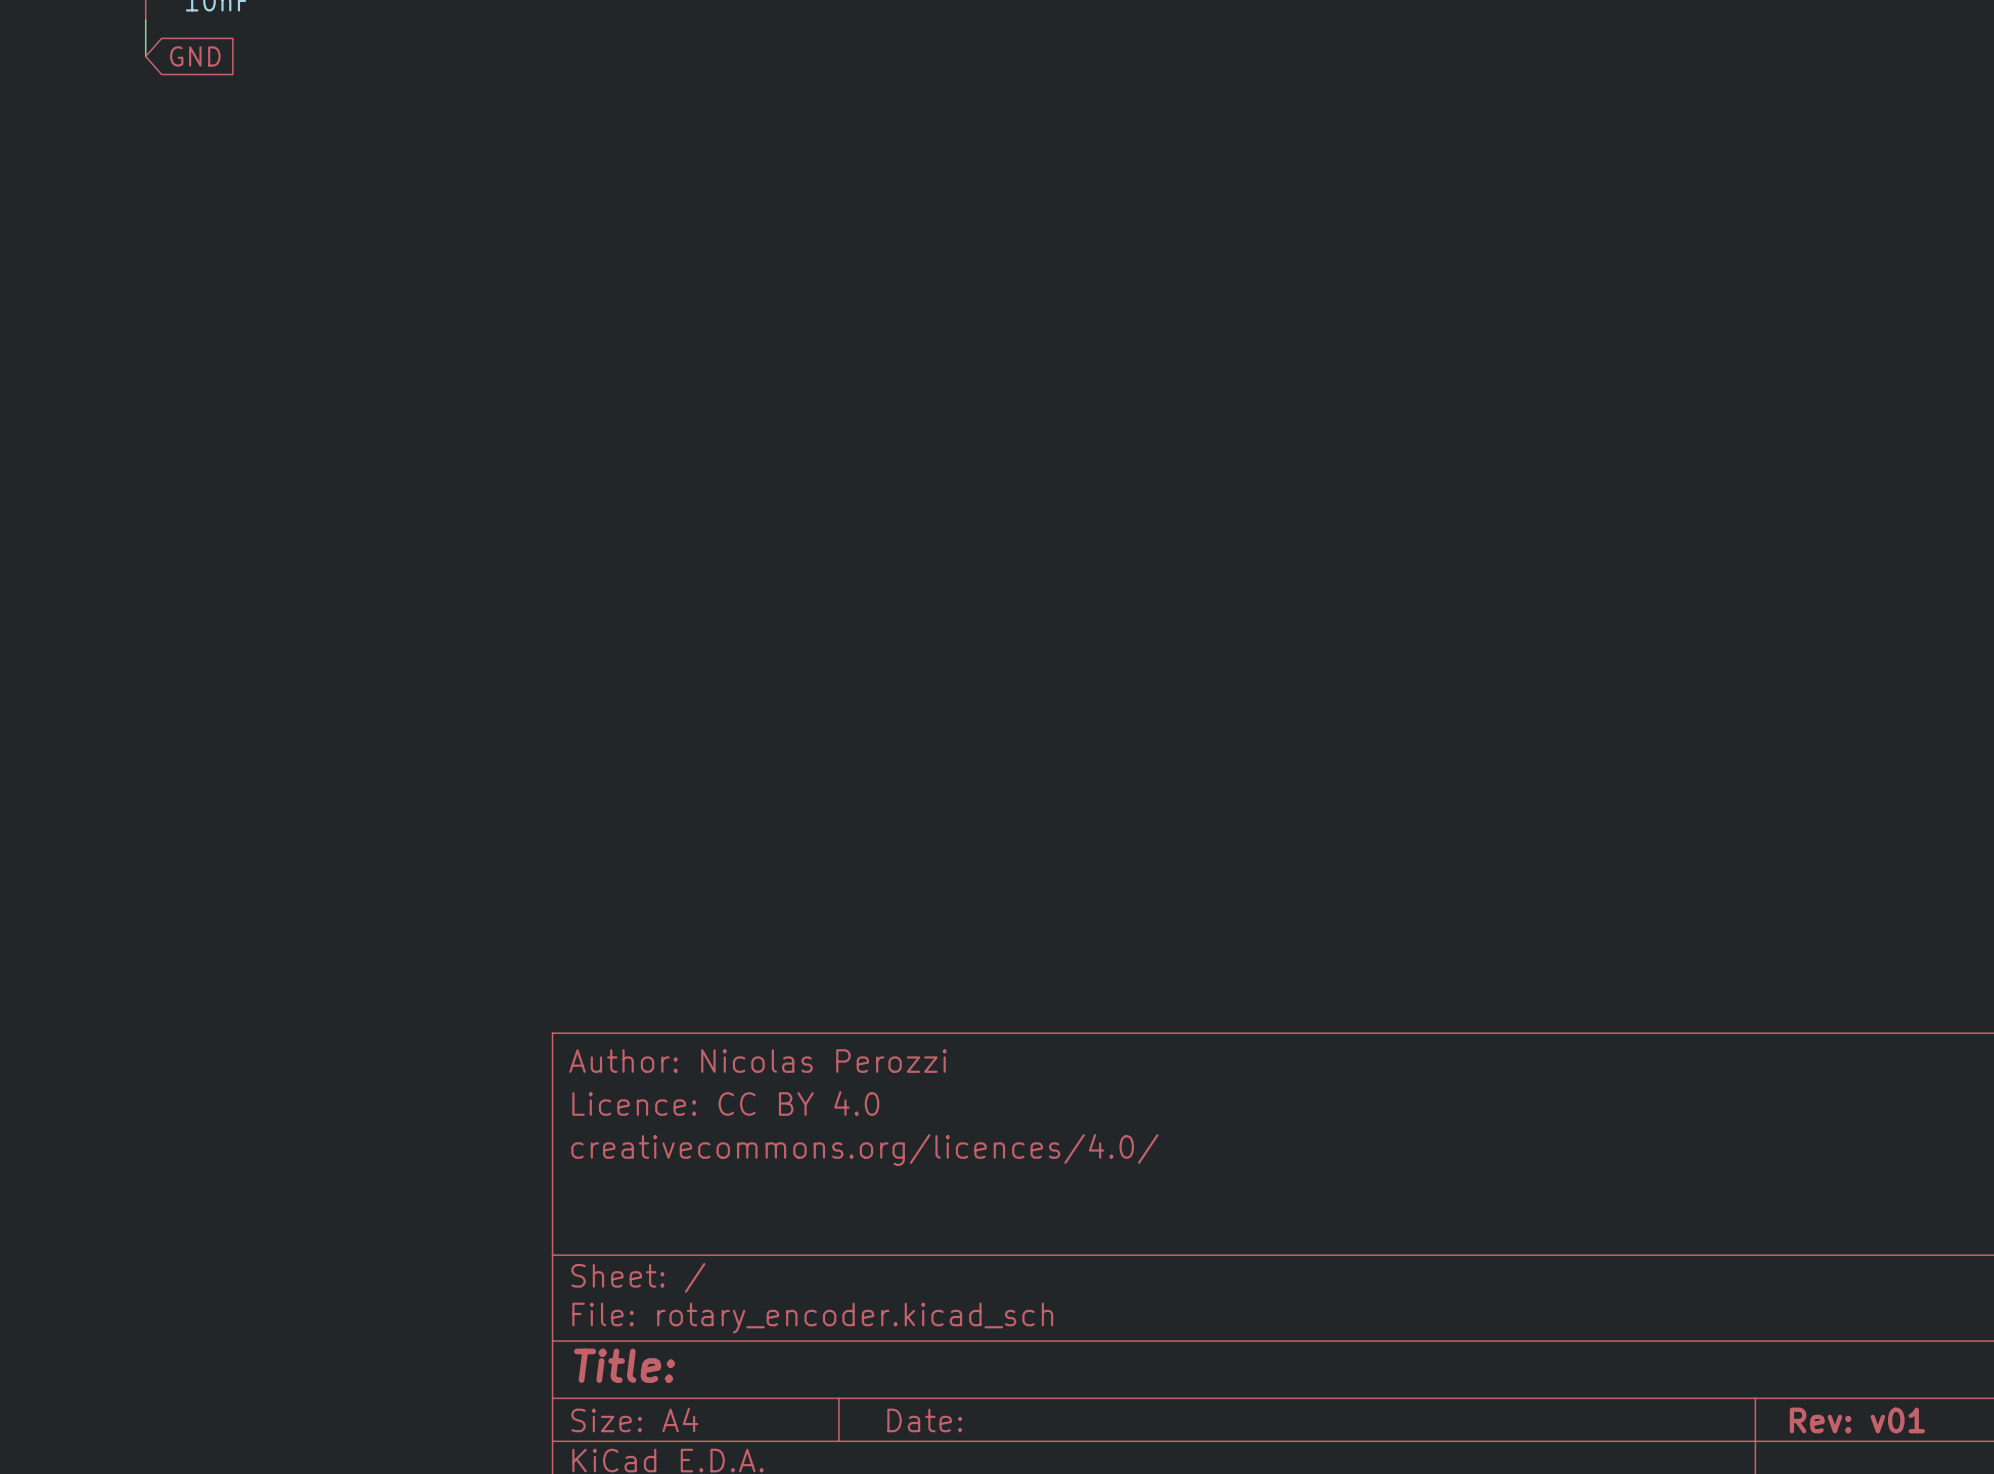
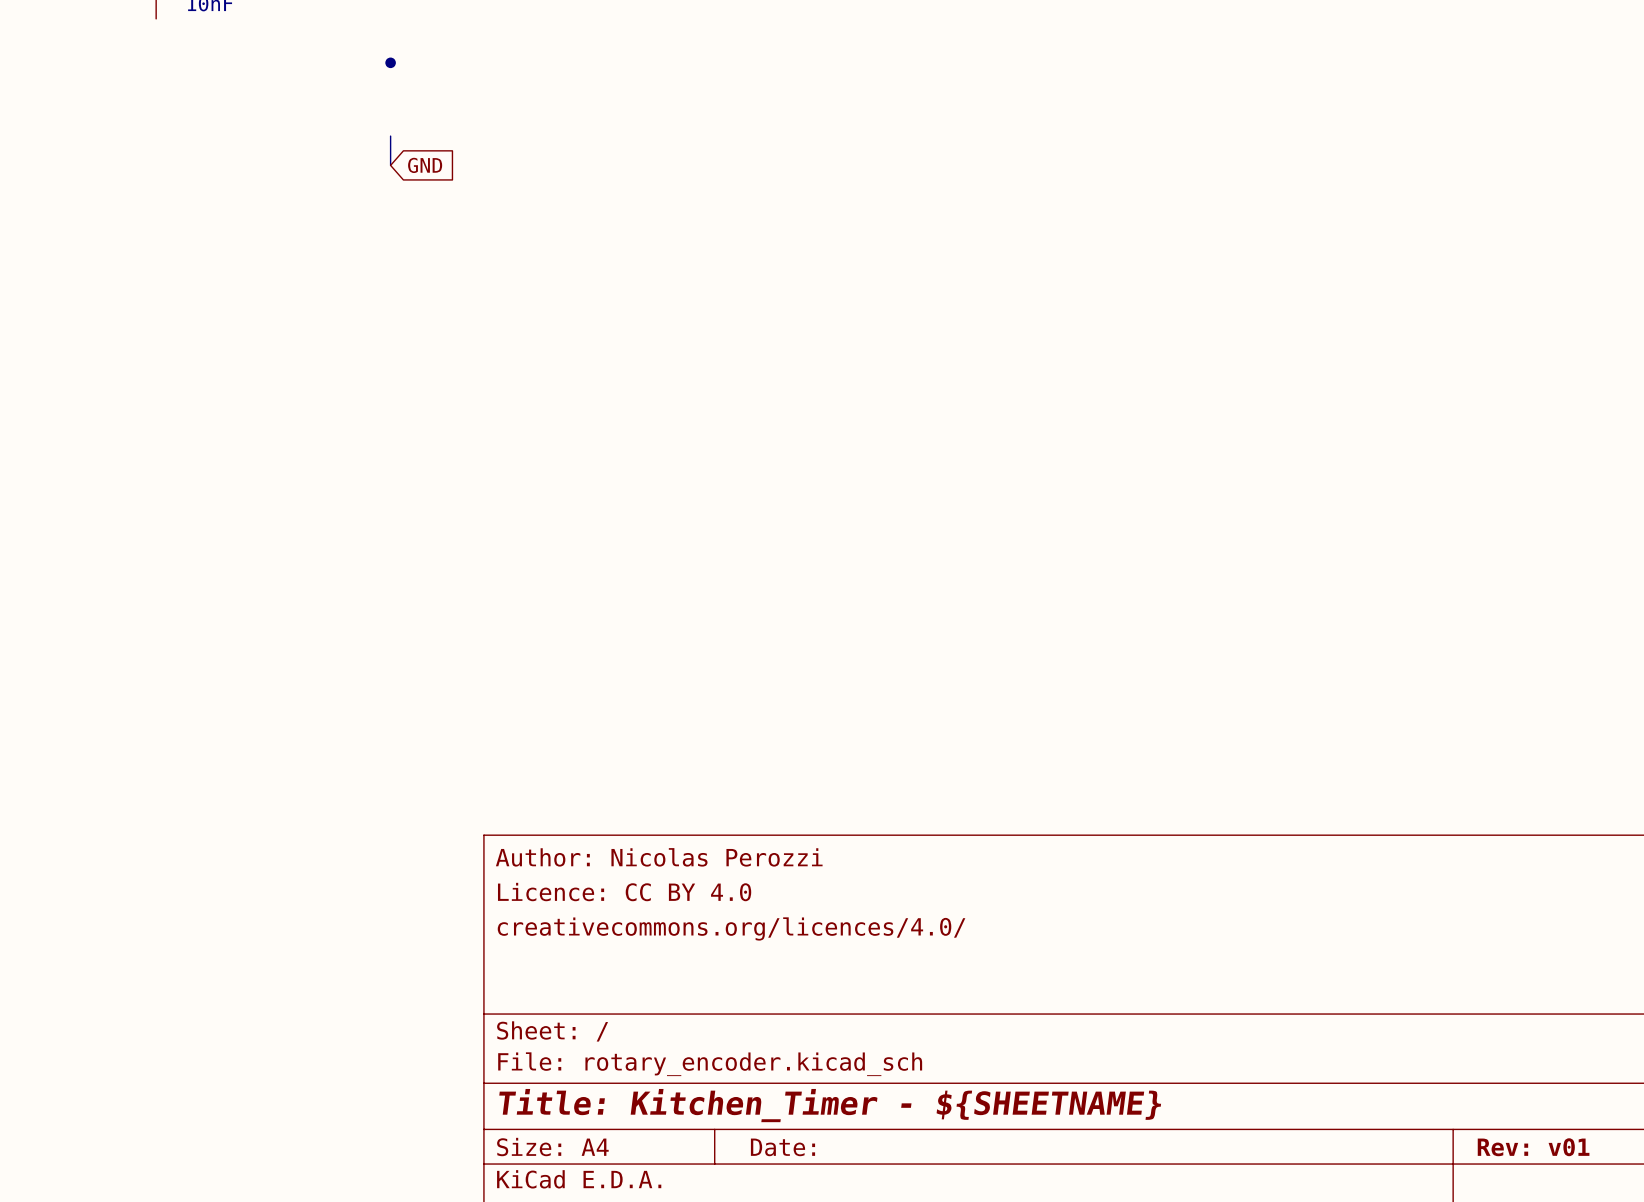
wire: (145, 20) (145, 56) -> (390, 136) (390, 165)
global label: GND (195, 56) -> none
junction: none -> (390, 62)
global label: none -> GND (425, 165)
title block: Title: (624, 1365) -> Title: Kitchen_Timer - ${SHEETNAME} (830, 1105)

